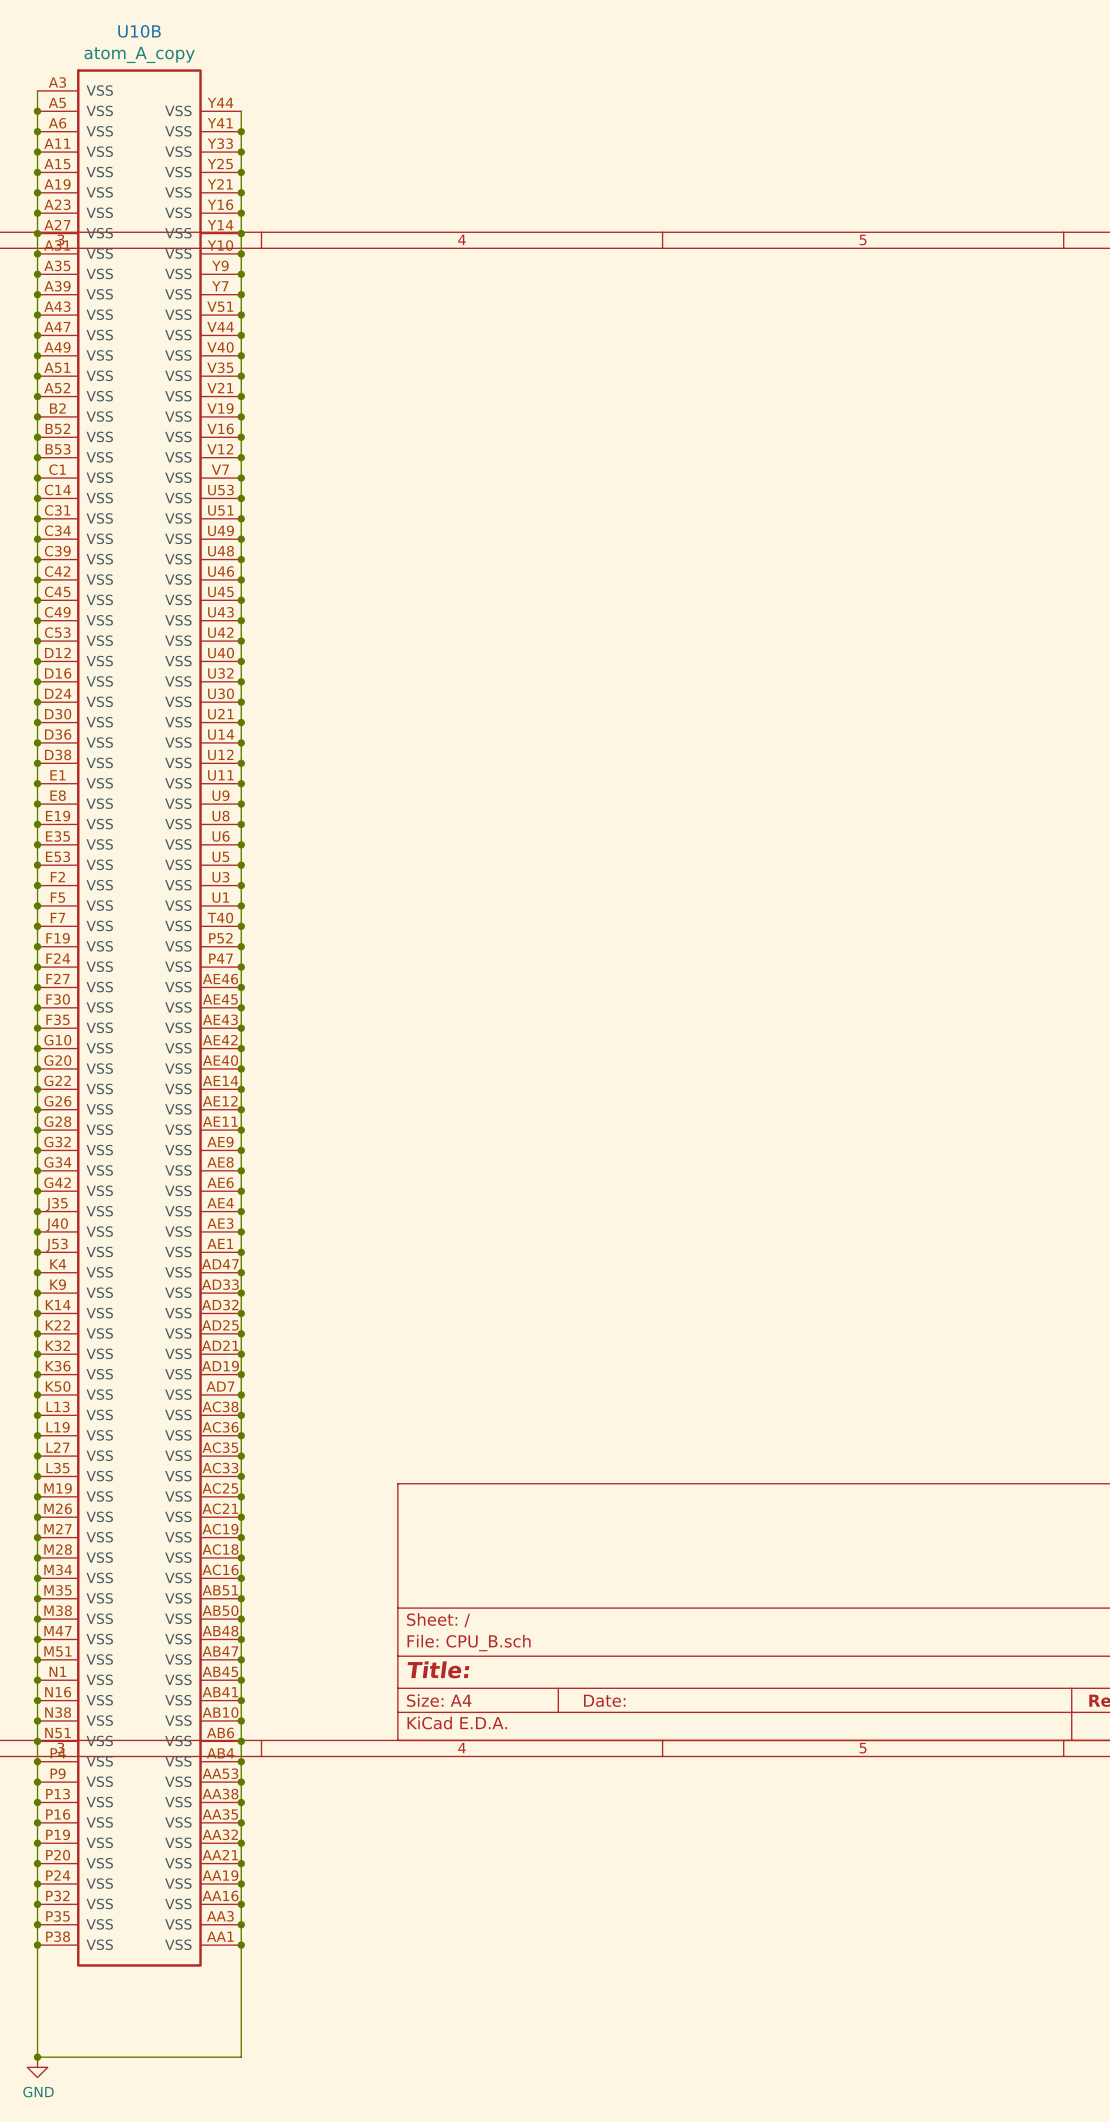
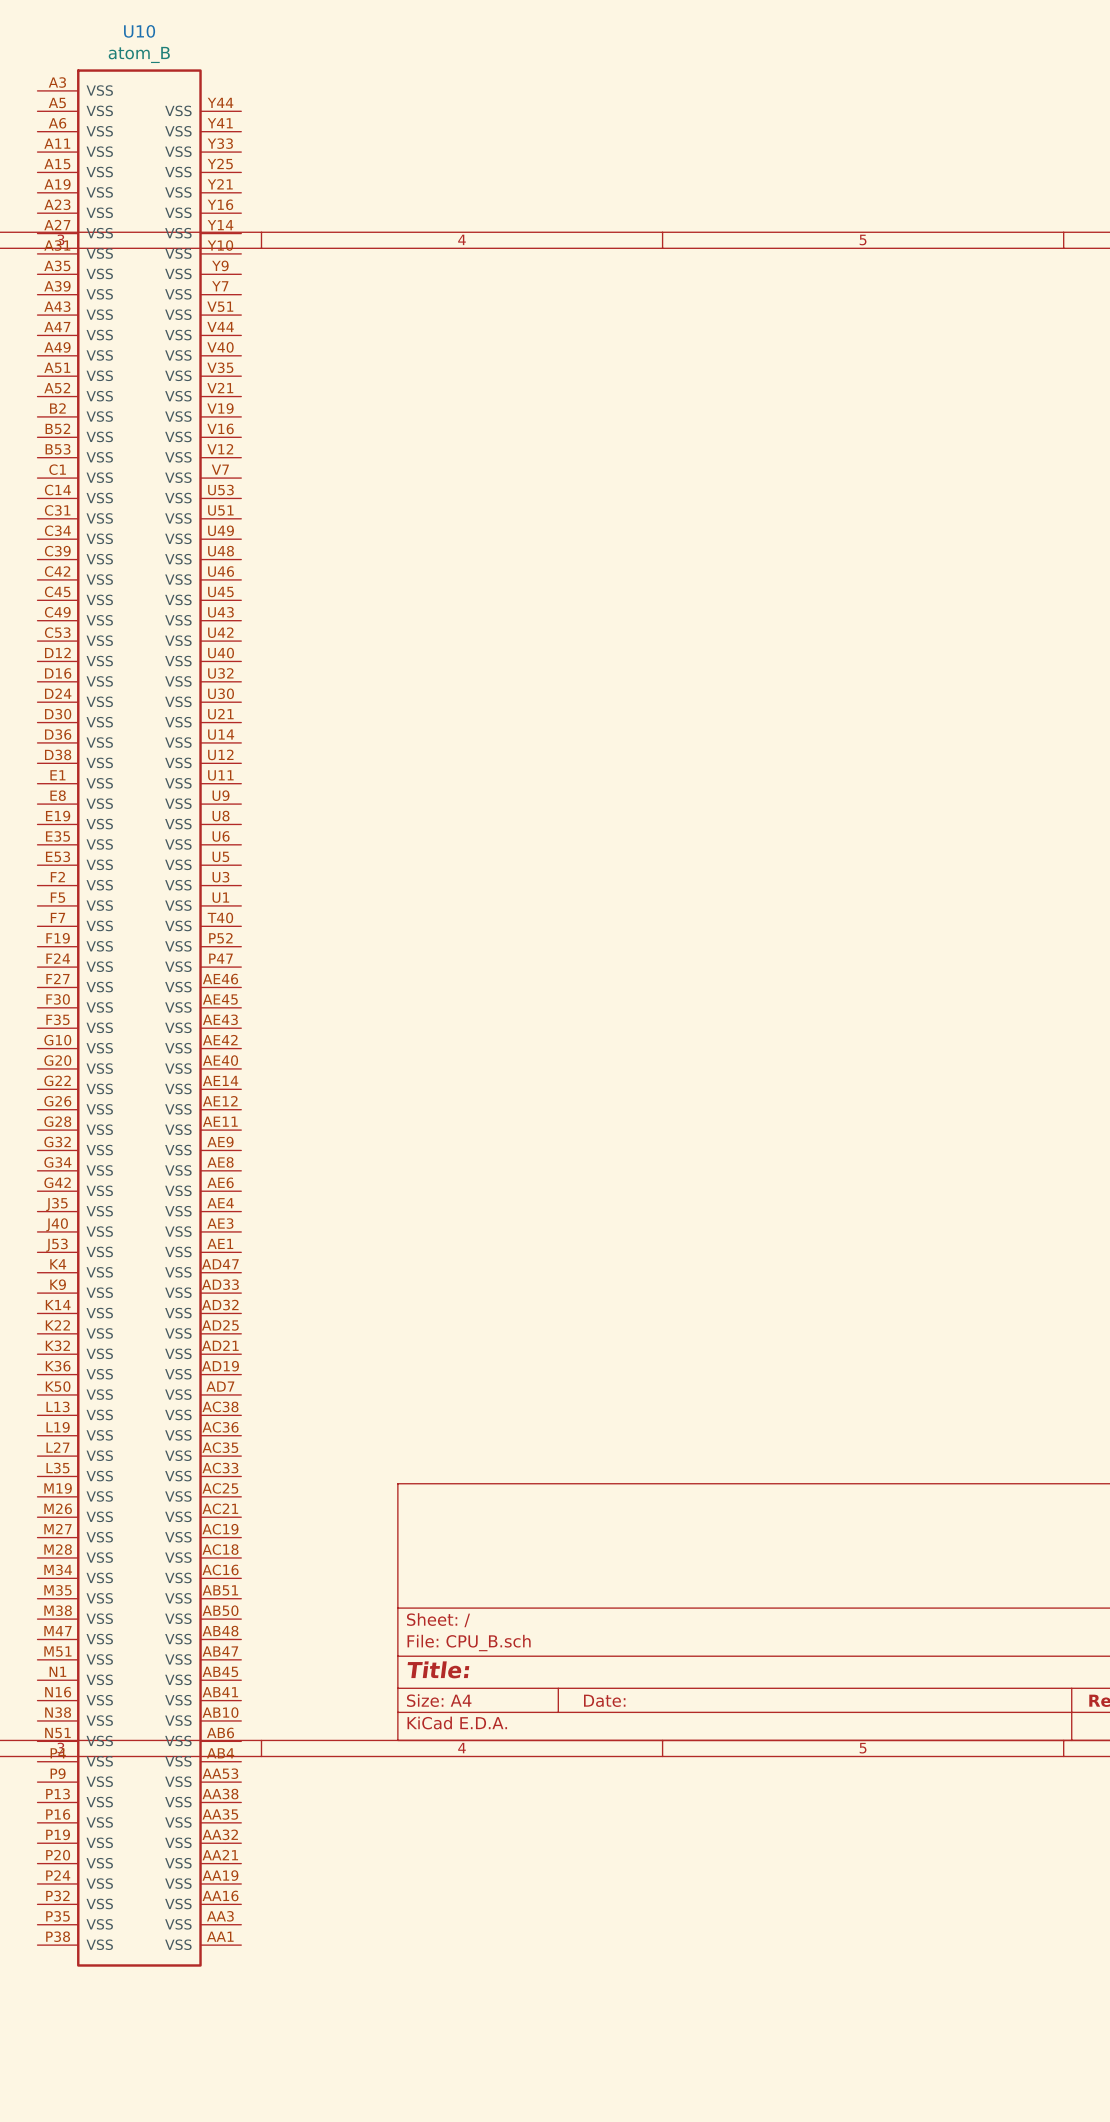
U10B name: U10B (139, 31) -> U10 (139, 31)
U10B value: atom_A_copy (139, 54) -> atom_B (139, 54)
wire: (37, 90) (37, 2057) (241, 2057) (241, 111) -> none
junction: (37, 111) -> none
junction: (37, 131) -> none
junction: (241, 131) -> none
junction: (37, 152) -> none
junction: (241, 152) -> none
junction: (37, 172) -> none
junction: (241, 172) -> none
junction: (37, 192) -> none
junction: (241, 192) -> none
junction: (37, 213) -> none
junction: (241, 213) -> none
junction: (37, 233) -> none
junction: (241, 233) -> none
junction: (37, 253) -> none
junction: (241, 253) -> none
junction: (37, 274) -> none
junction: (241, 274) -> none
junction: (37, 294) -> none
junction: (241, 294) -> none
junction: (37, 315) -> none
junction: (241, 315) -> none
junction: (37, 335) -> none
junction: (241, 335) -> none
junction: (37, 355) -> none
junction: (241, 355) -> none
junction: (37, 376) -> none
junction: (241, 376) -> none
junction: (37, 396) -> none
junction: (241, 396) -> none
junction: (37, 416) -> none
junction: (241, 416) -> none
junction: (37, 437) -> none
junction: (241, 437) -> none
junction: (37, 457) -> none
junction: (241, 457) -> none
junction: (37, 478) -> none
junction: (241, 478) -> none
junction: (37, 498) -> none
junction: (241, 498) -> none
junction: (37, 518) -> none
junction: (241, 518) -> none
junction: (37, 539) -> none
junction: (241, 539) -> none
junction: (37, 559) -> none
junction: (241, 559) -> none
junction: (37, 579) -> none
junction: (241, 579) -> none
junction: (37, 600) -> none
junction: (241, 600) -> none
junction: (37, 620) -> none
junction: (241, 620) -> none
junction: (37, 641) -> none
junction: (241, 641) -> none
junction: (37, 661) -> none
junction: (241, 661) -> none
junction: (37, 681) -> none
junction: (241, 681) -> none
junction: (37, 702) -> none
junction: (241, 702) -> none
junction: (37, 722) -> none
junction: (241, 722) -> none
junction: (37, 742) -> none
junction: (241, 742) -> none
junction: (37, 763) -> none
junction: (241, 763) -> none
junction: (37, 783) -> none
junction: (241, 783) -> none
junction: (37, 804) -> none
junction: (241, 804) -> none
junction: (37, 824) -> none
junction: (241, 824) -> none
junction: (37, 844) -> none
junction: (241, 844) -> none
junction: (37, 865) -> none
junction: (241, 865) -> none
junction: (37, 885) -> none
junction: (241, 885) -> none
junction: (37, 905) -> none
junction: (241, 905) -> none
junction: (37, 926) -> none
junction: (241, 926) -> none
junction: (37, 946) -> none
junction: (241, 946) -> none
junction: (37, 967) -> none
junction: (241, 967) -> none
junction: (37, 987) -> none
junction: (241, 987) -> none
junction: (37, 1007) -> none
junction: (241, 1007) -> none
junction: (37, 1028) -> none
junction: (241, 1028) -> none
junction: (37, 1048) -> none
junction: (241, 1048) -> none
junction: (37, 1068) -> none
junction: (241, 1068) -> none
junction: (37, 1089) -> none
junction: (241, 1089) -> none
junction: (37, 1109) -> none
junction: (241, 1109) -> none
junction: (37, 1130) -> none
junction: (241, 1130) -> none
junction: (37, 1150) -> none
junction: (241, 1150) -> none
junction: (37, 1170) -> none
junction: (241, 1170) -> none
junction: (37, 1191) -> none
junction: (241, 1191) -> none
junction: (37, 1211) -> none
junction: (241, 1211) -> none
junction: (37, 1231) -> none
junction: (241, 1231) -> none
junction: (37, 1252) -> none
junction: (241, 1252) -> none
junction: (37, 1272) -> none
junction: (241, 1272) -> none
junction: (37, 1293) -> none
junction: (241, 1293) -> none
junction: (37, 1313) -> none
junction: (241, 1313) -> none
junction: (37, 1333) -> none
junction: (241, 1333) -> none
junction: (37, 1354) -> none
junction: (241, 1354) -> none
junction: (37, 1374) -> none
junction: (241, 1374) -> none
junction: (37, 1394) -> none
junction: (241, 1394) -> none
junction: (37, 1415) -> none
junction: (241, 1415) -> none
junction: (37, 1435) -> none
junction: (241, 1435) -> none
junction: (37, 1456) -> none
junction: (241, 1456) -> none
junction: (37, 1476) -> none
junction: (241, 1476) -> none
junction: (37, 1496) -> none
junction: (241, 1496) -> none
junction: (37, 1517) -> none
junction: (241, 1517) -> none
junction: (37, 1537) -> none
junction: (241, 1537) -> none
junction: (37, 1557) -> none
junction: (241, 1557) -> none
junction: (37, 1578) -> none
junction: (241, 1578) -> none
junction: (37, 1598) -> none
junction: (241, 1598) -> none
junction: (37, 1619) -> none
junction: (241, 1619) -> none
junction: (37, 1639) -> none
junction: (241, 1639) -> none
junction: (37, 1659) -> none
junction: (241, 1659) -> none
junction: (37, 1680) -> none
junction: (241, 1680) -> none
junction: (37, 1700) -> none
junction: (241, 1700) -> none
junction: (37, 1720) -> none
junction: (241, 1720) -> none
junction: (37, 1741) -> none
junction: (241, 1741) -> none
junction: (37, 1761) -> none
junction: (241, 1761) -> none
junction: (37, 1782) -> none
junction: (241, 1782) -> none
junction: (37, 1802) -> none
junction: (241, 1802) -> none
junction: (37, 1822) -> none
junction: (241, 1822) -> none
junction: (37, 1843) -> none
junction: (241, 1843) -> none
junction: (37, 1863) -> none
junction: (241, 1863) -> none
junction: (37, 1883) -> none
junction: (241, 1883) -> none
junction: (37, 1904) -> none
junction: (241, 1904) -> none
junction: (37, 1924) -> none
junction: (241, 1924) -> none
junction: (37, 1945) -> none
junction: (241, 1945) -> none
junction: (37, 2057) -> none
power symbol: GND (37, 2067) -> none

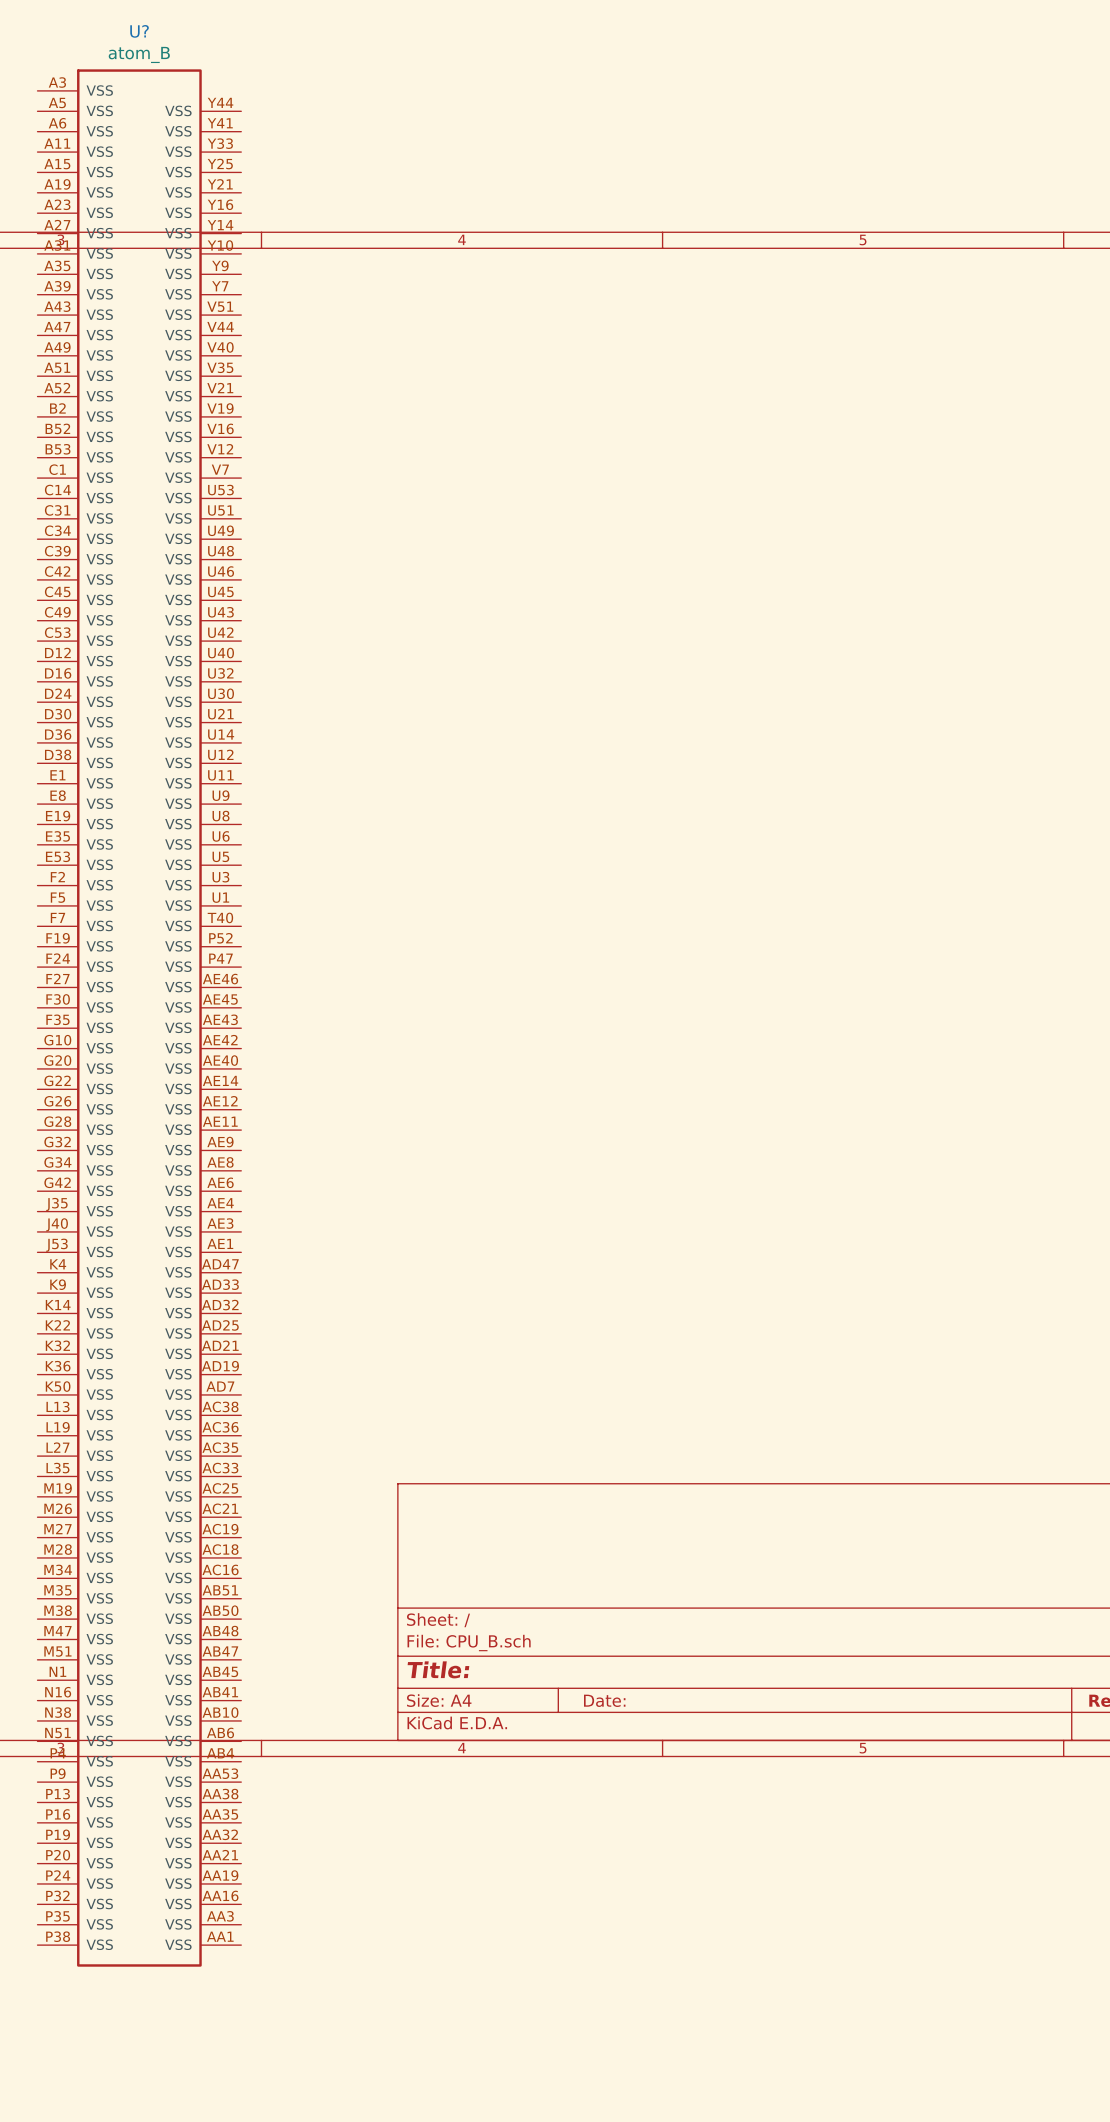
U10 name: U10 (139, 31) -> U? (139, 31)

